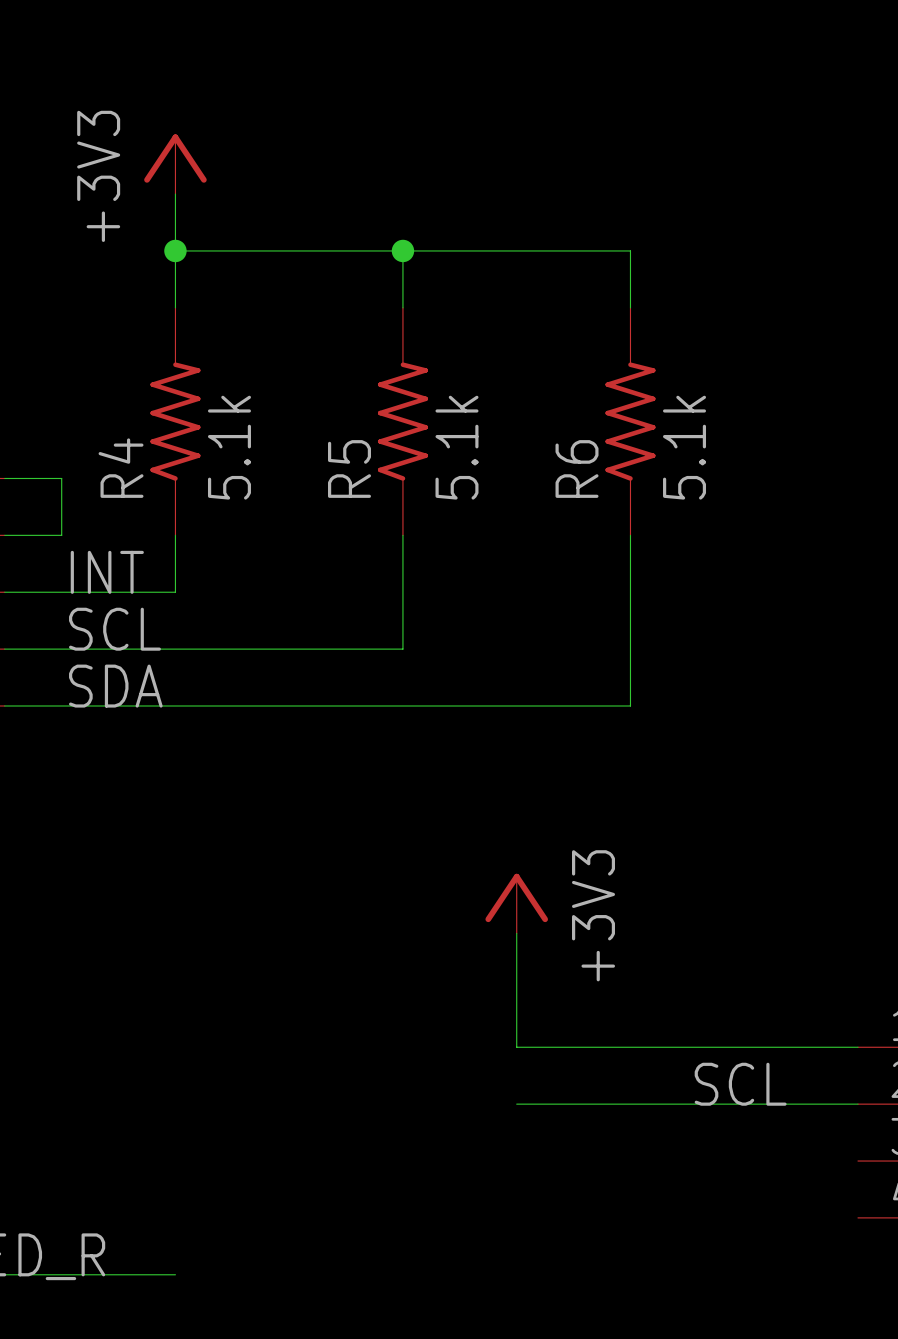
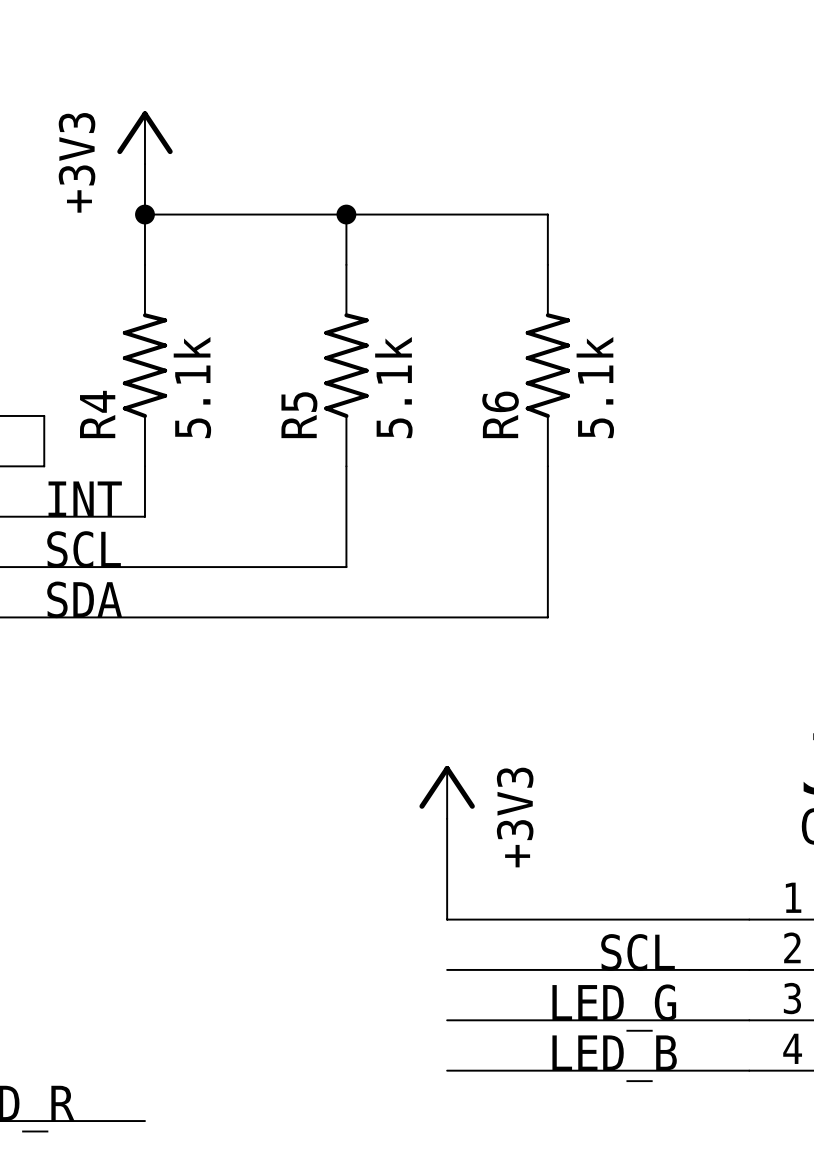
label: none -> LED_G (614, 1008)
wire: none -> (447, 1020) (749, 1020)
label: none -> LED_B (614, 1058)
wire: none -> (447, 1070) (749, 1070)

